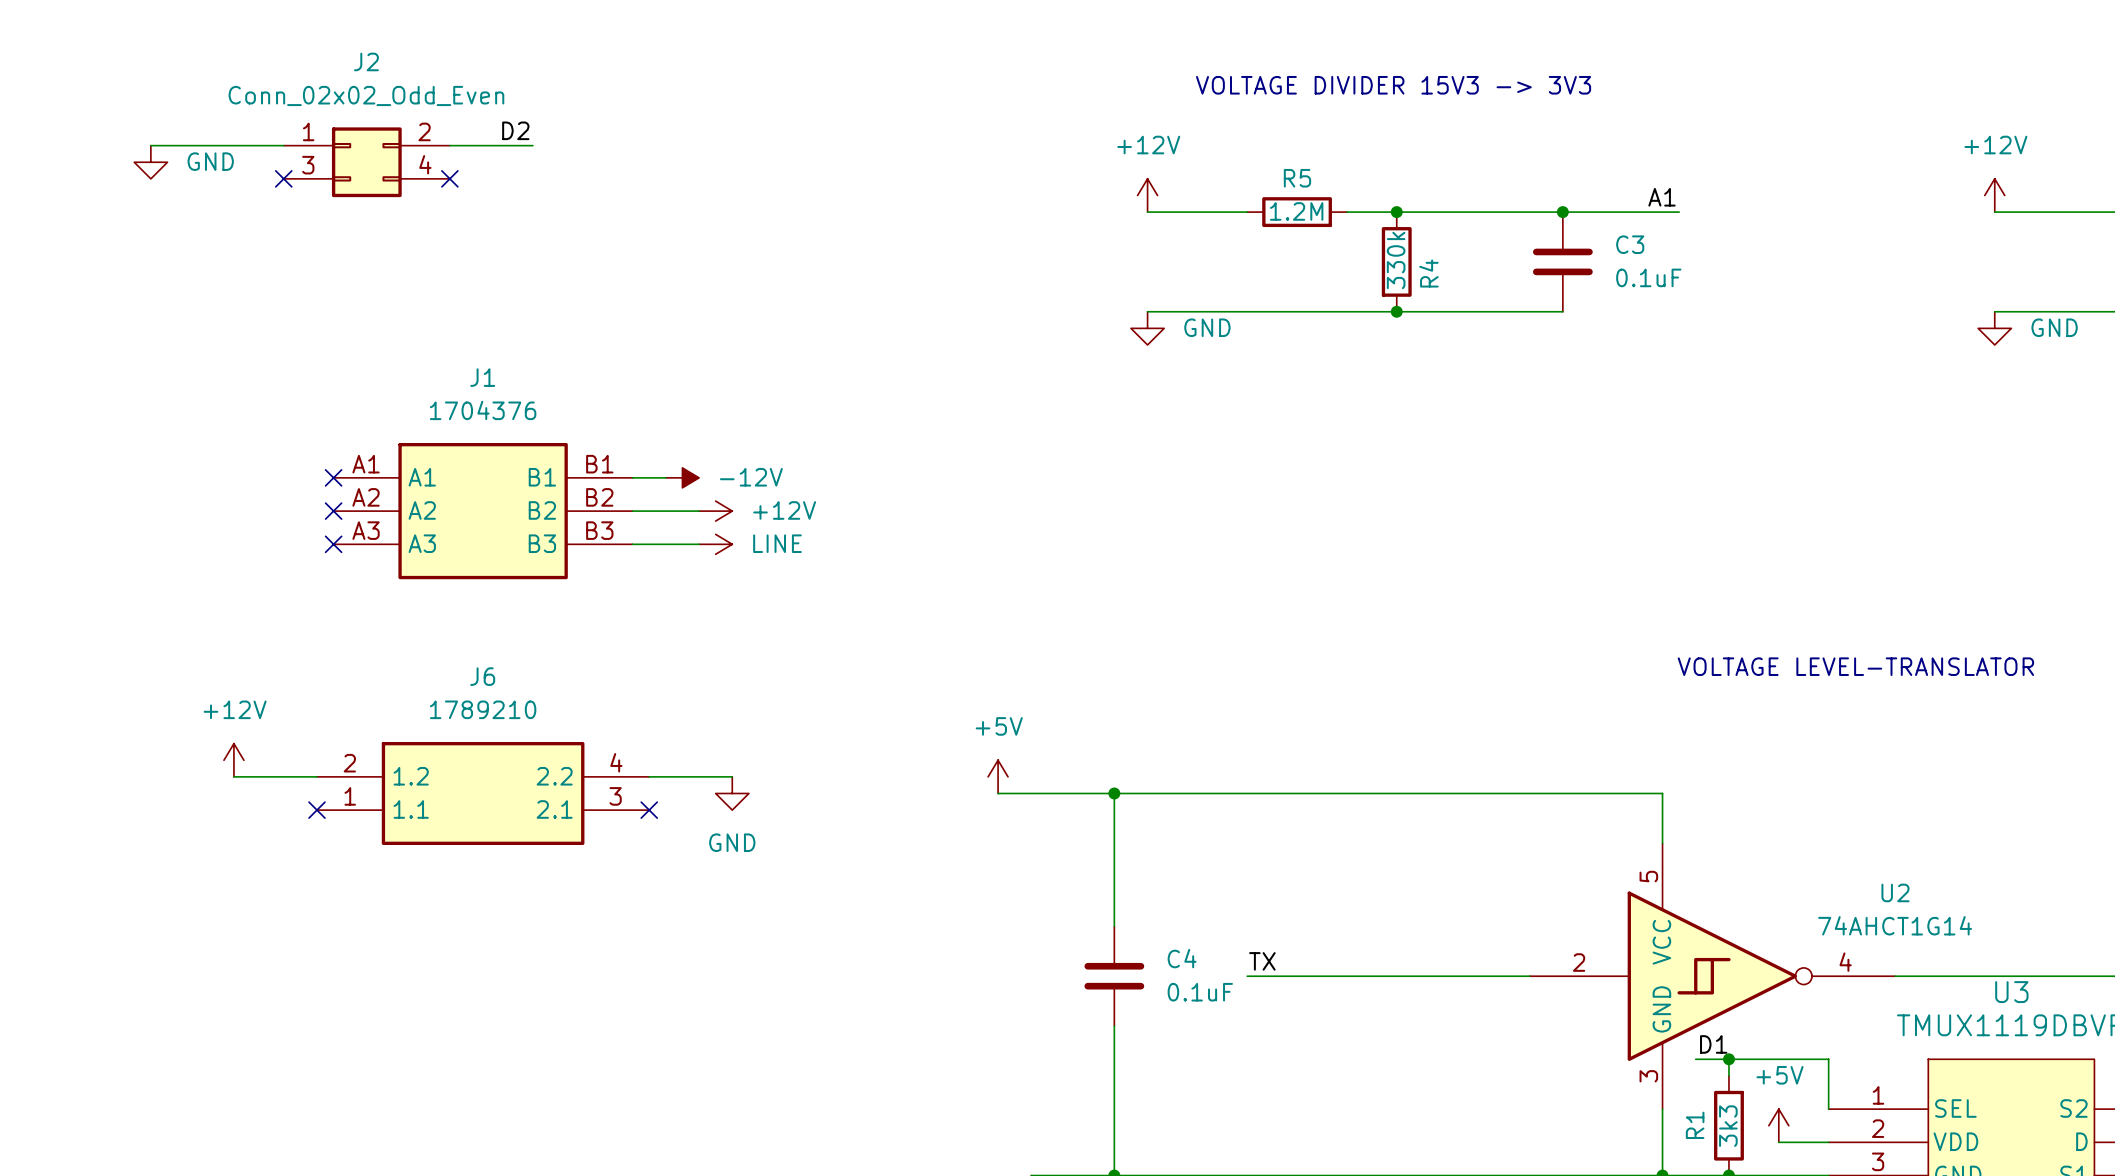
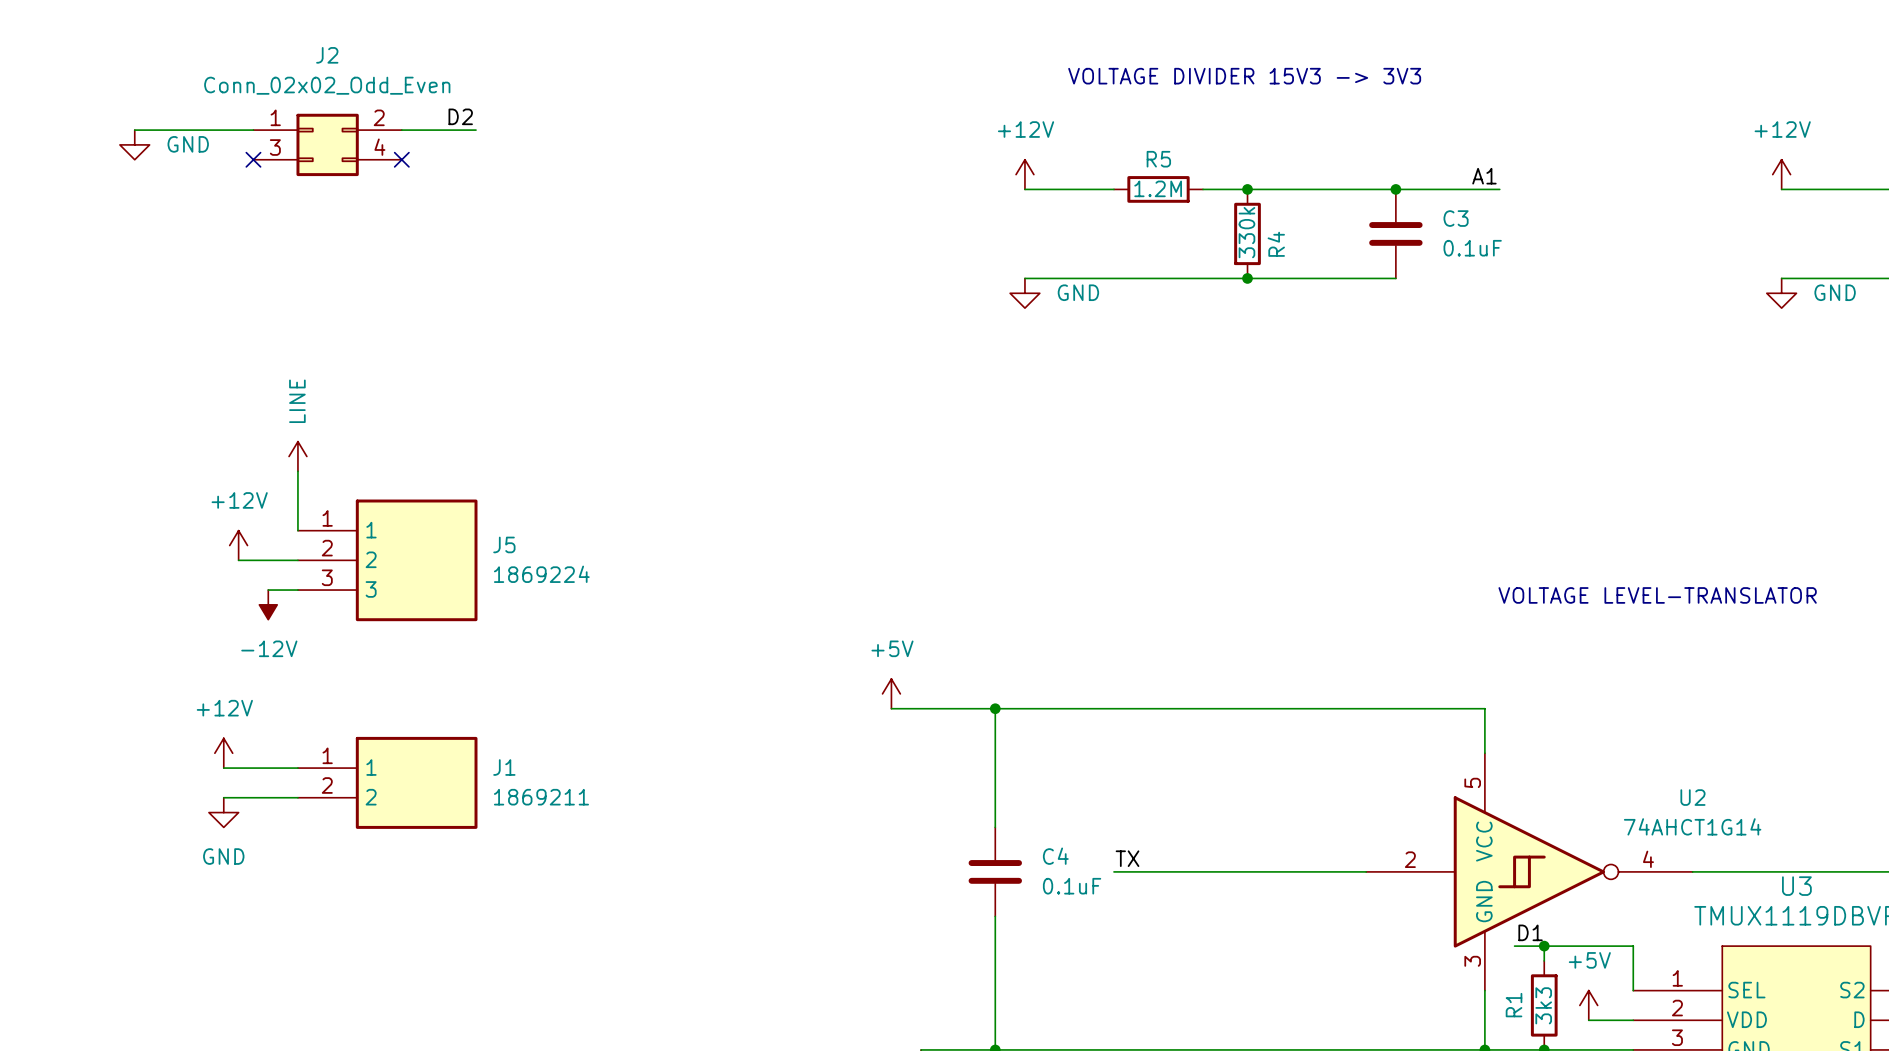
J1 name position: J1 (482, 377) -> J1 (504, 767)
J1 value: 1704376 (483, 410) -> 1869211 (541, 797)
J1 symbol: [333, 442, 633, 580] -> [297, 736, 478, 829]
no-connect mark: (333, 477) -> none
wire: (632, 477) (665, 477) -> none
power symbol: -12V (682, 477) -> none
no-connect mark: (333, 511) -> none
power symbol: none -> LINE (297, 456)
wire: (632, 511) (699, 511) -> none
power symbol: +12V (715, 511) -> none
wire: none -> (297, 471) (297, 530)
no-connect mark: (333, 544) -> none
wire: (632, 544) (699, 544) -> none
power symbol: LINE (715, 544) -> none
power symbol: none -> +12V (238, 545)
wire: none -> (238, 560) (297, 560)
J5: none -> 1869224 (387, 560)
wire: none -> (268, 590) (297, 590)
power symbol: none -> -12V (268, 604)
power symbol: +12V (233, 760) -> none
wire: (233, 776) (316, 776) -> (223, 768) (297, 768)
wire: (649, 776) (732, 776) -> none
J6: 1789210 (483, 793) -> none
power symbol: GND (732, 793) -> none
no-connect mark: (316, 810) -> none
no-connect mark: (649, 810) -> none
power symbol: none -> +12V (223, 753)
wire: none -> (223, 797) (297, 797)
power symbol: none -> GND (223, 812)

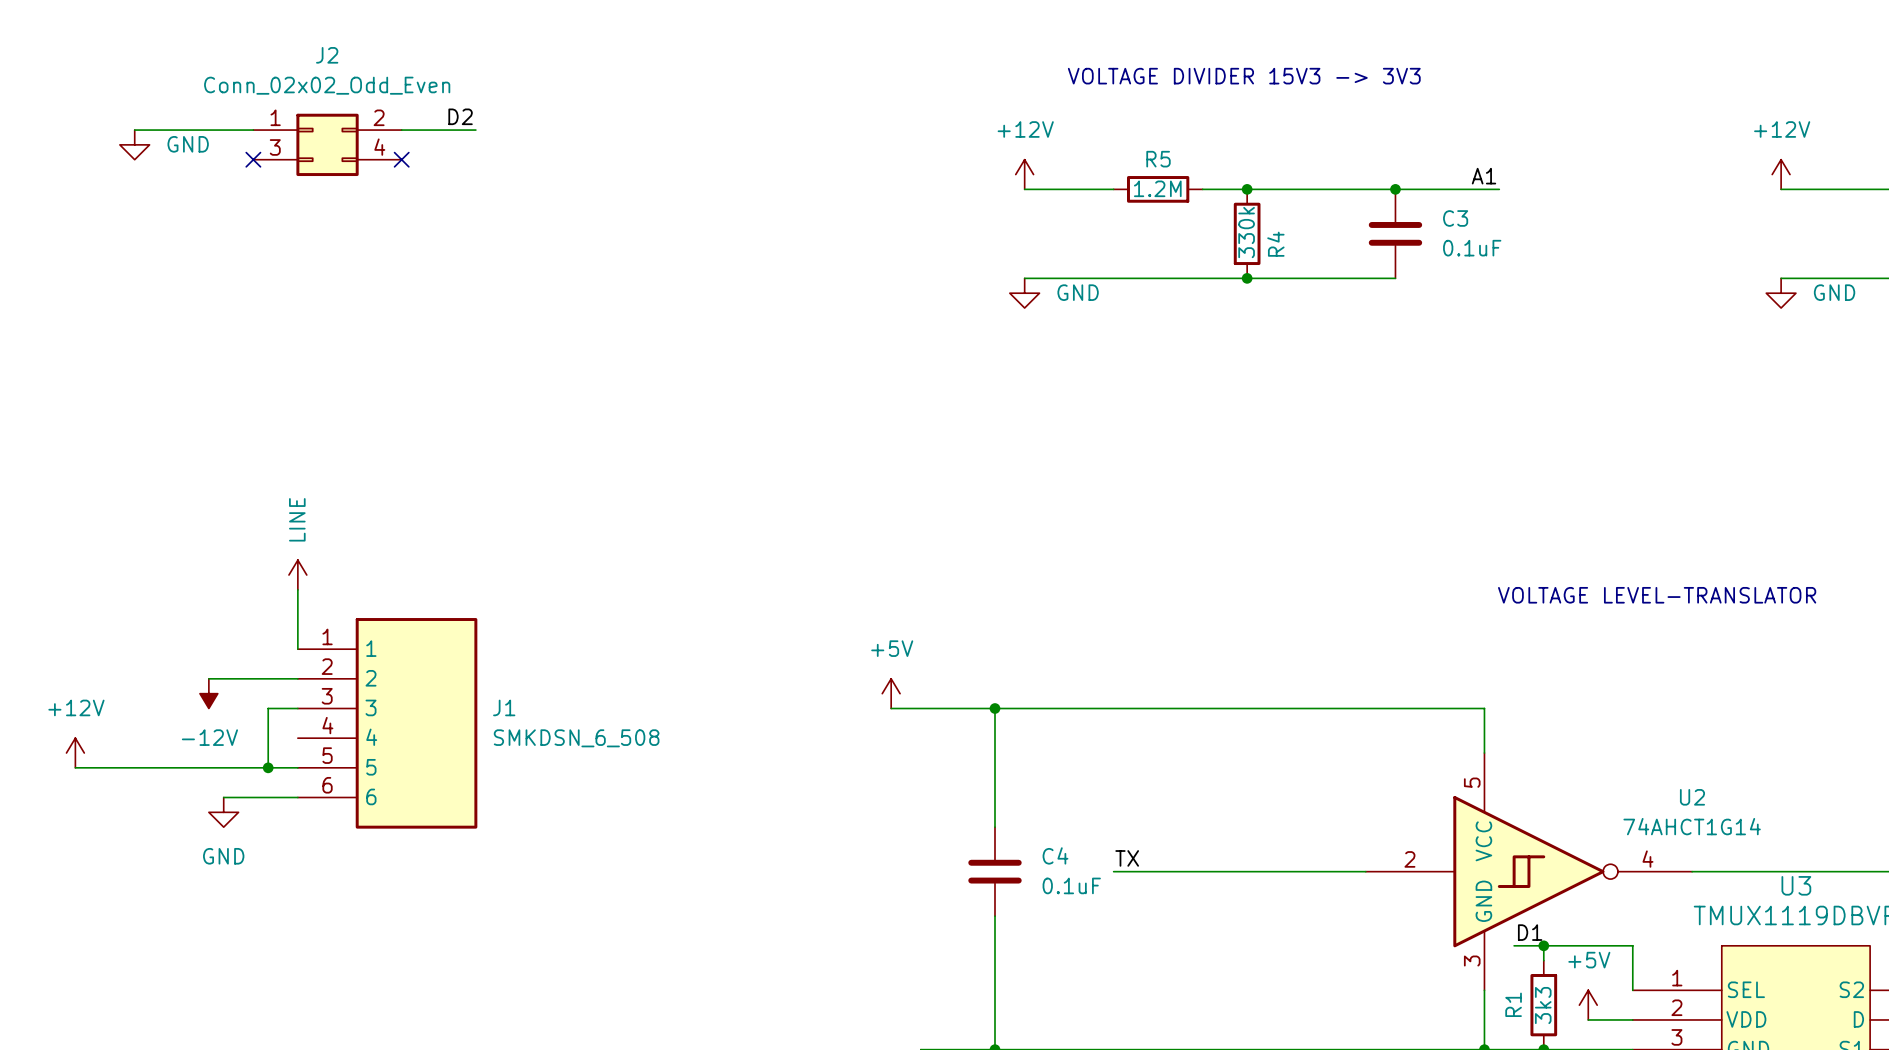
power symbol position: LINE (297, 456) -> LINE (297, 575)
wire: (297, 471) (297, 530) -> none
power symbol: +12V (238, 545) -> none
wire: (238, 560) (297, 560) -> none
J5: 1869224 (387, 560) -> none
wire: (268, 590) (297, 590) -> (297, 649) (297, 589)
power symbol position: -12V (268, 604) -> -12V (208, 693)
wire: none -> (208, 678) (297, 678)
wire: none -> (297, 708) (268, 708) (268, 767)
J1 symbol: [297, 736, 478, 829] -> [297, 618, 478, 829]
power symbol: none -> +12V (75, 753)
power symbol: +12V (223, 753) -> none
wire: none -> (75, 767) (223, 767)
junction: none -> (268, 767)
J1 value: 1869211 (541, 797) -> SMKDSN_6_508 (576, 738)

